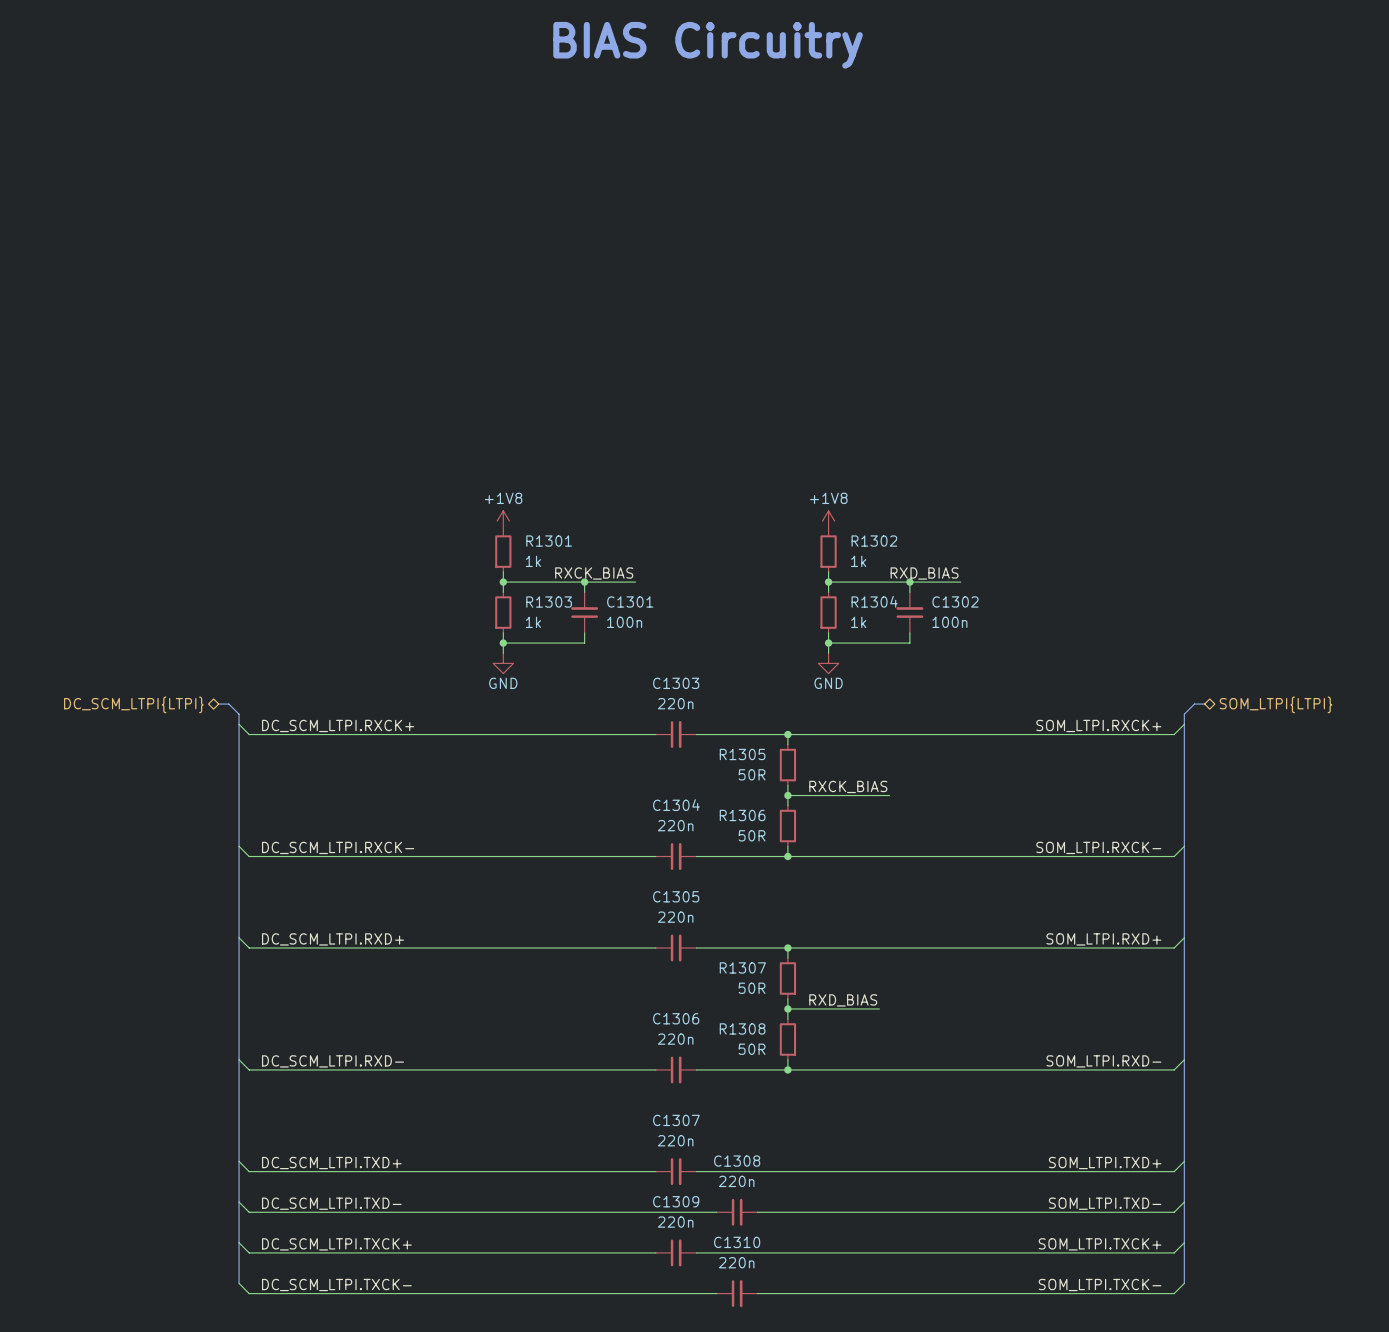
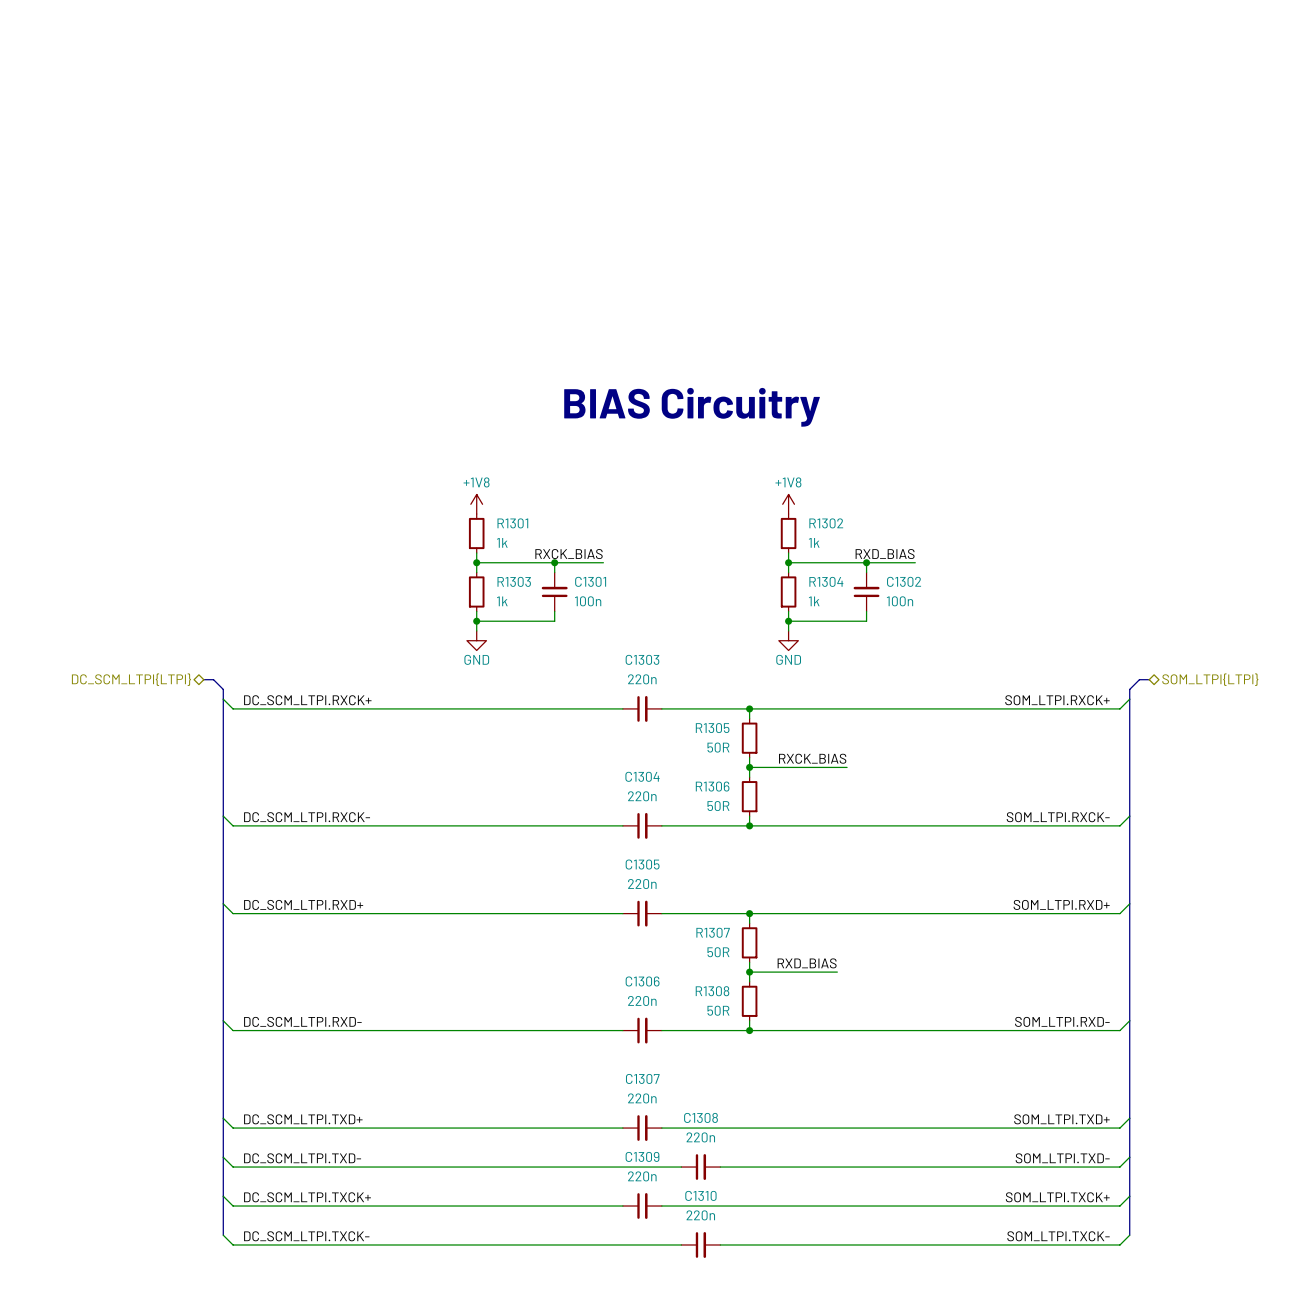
text: BIAS Circuitry (708, 45) -> none
text: none -> BIAS Circuitry (692, 407)

